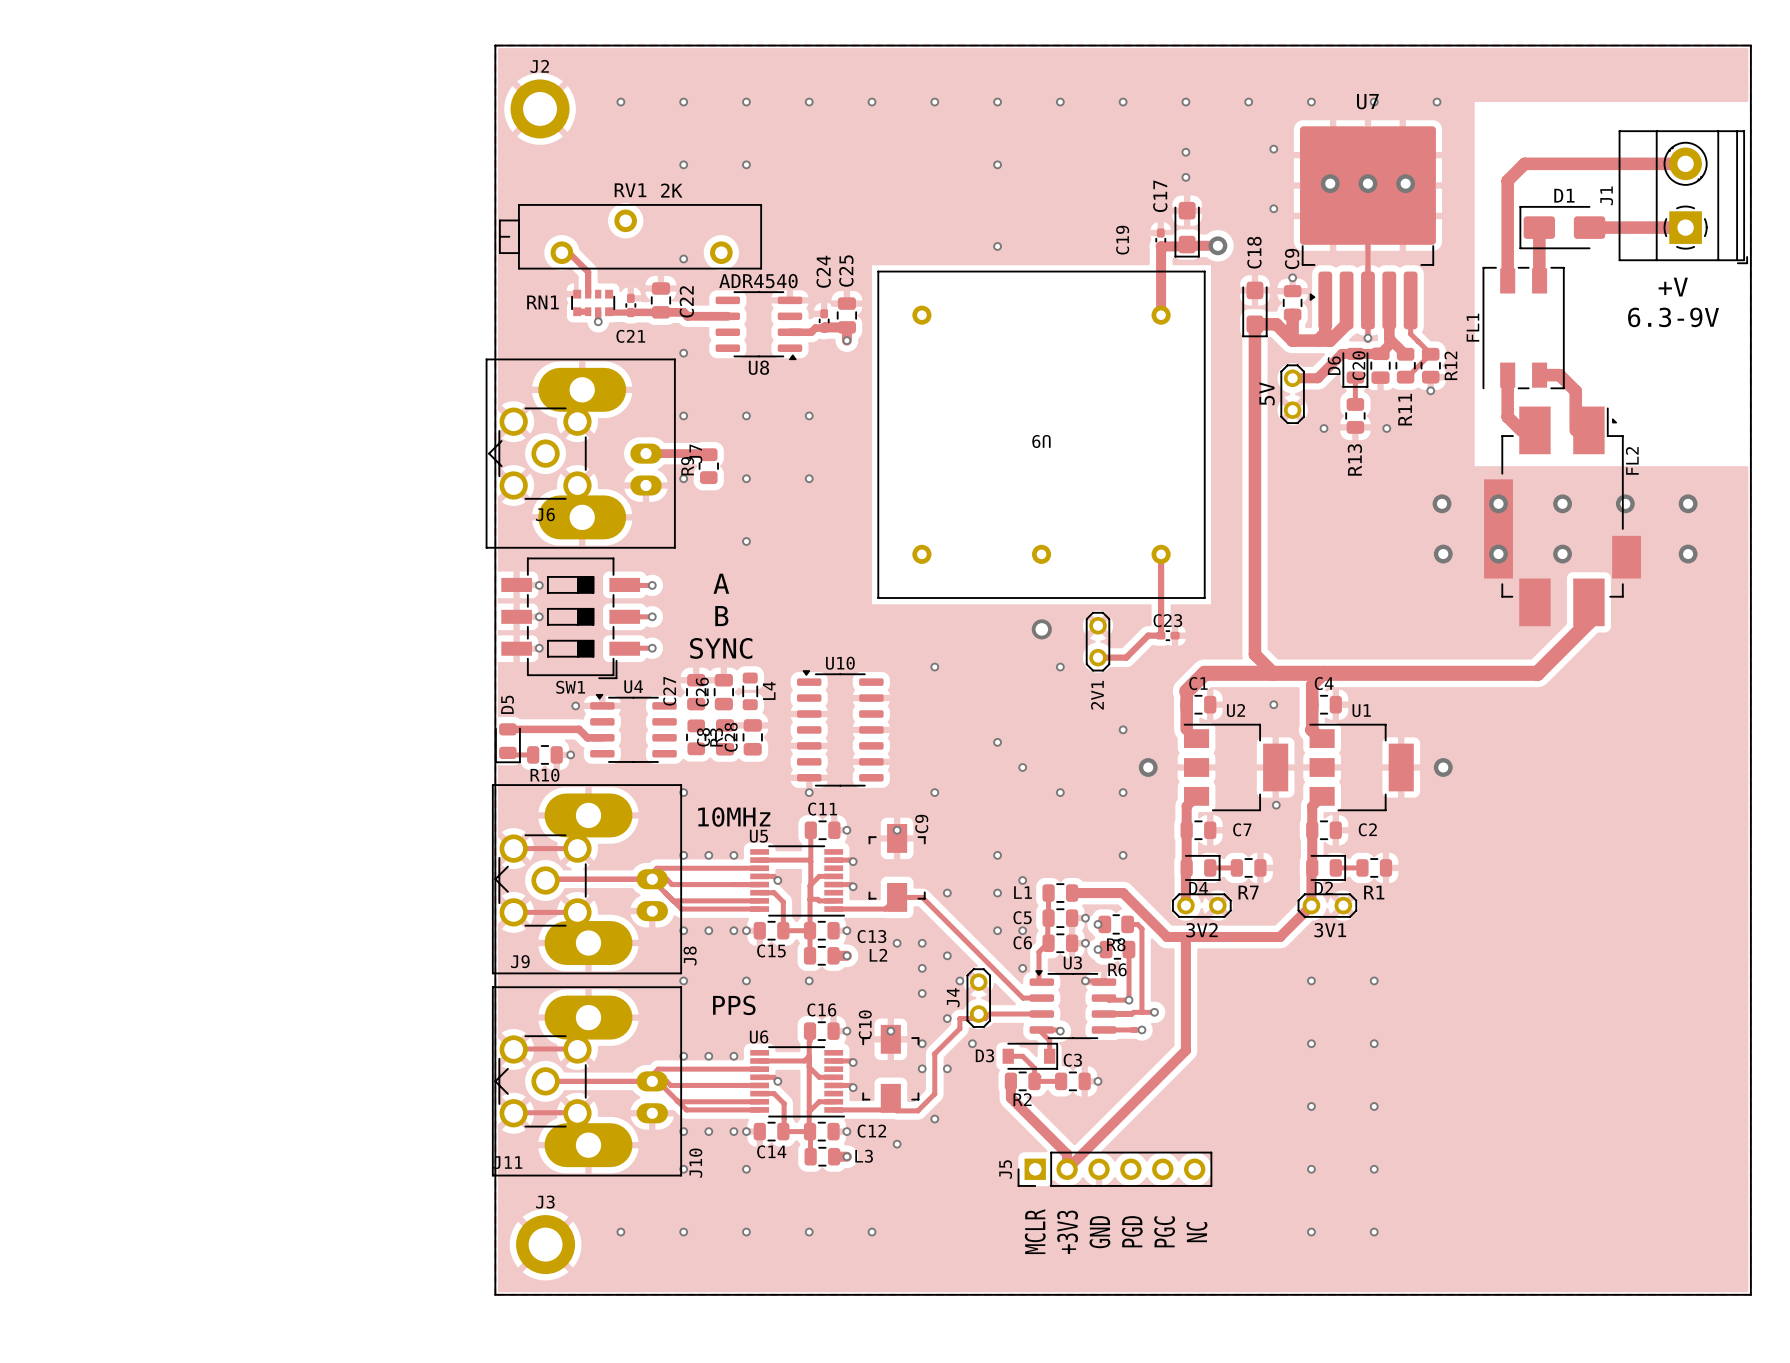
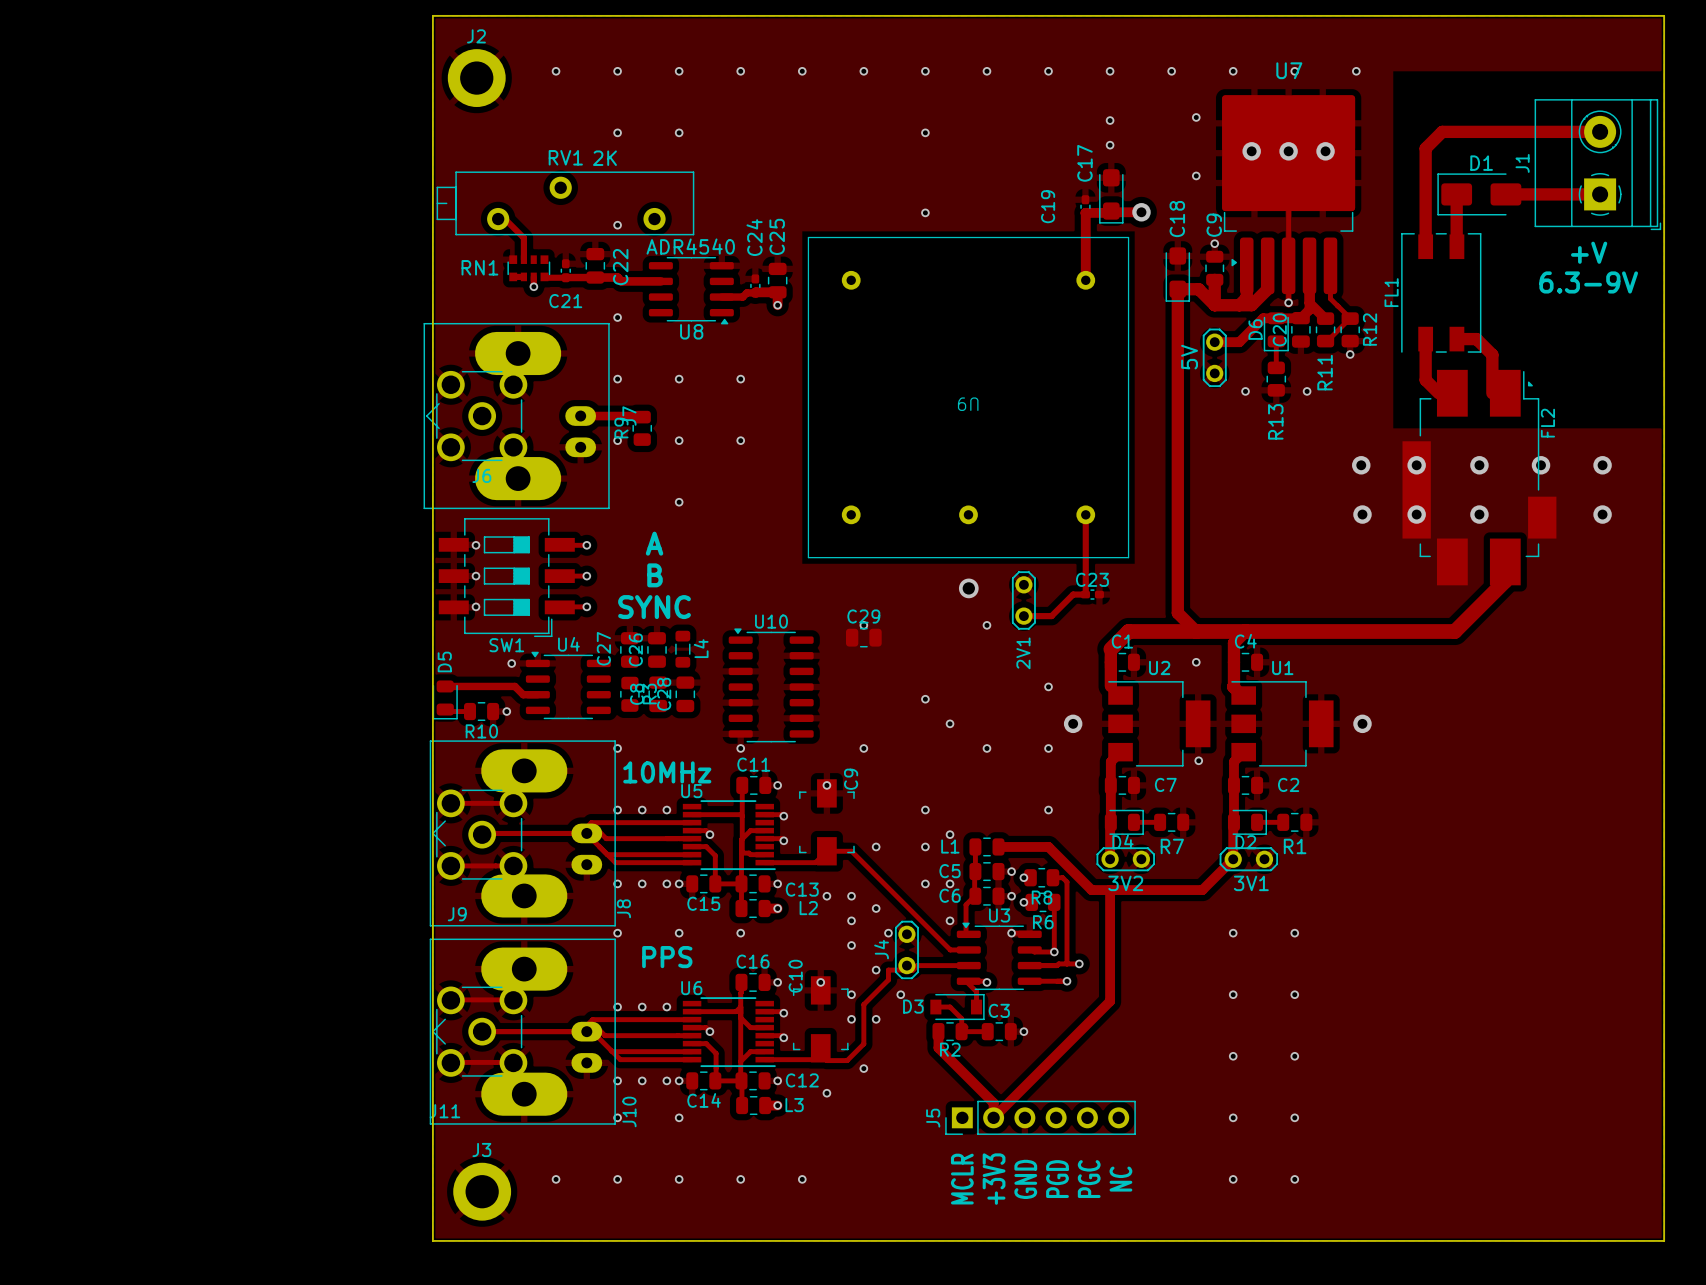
C29: none -> (863, 637)

